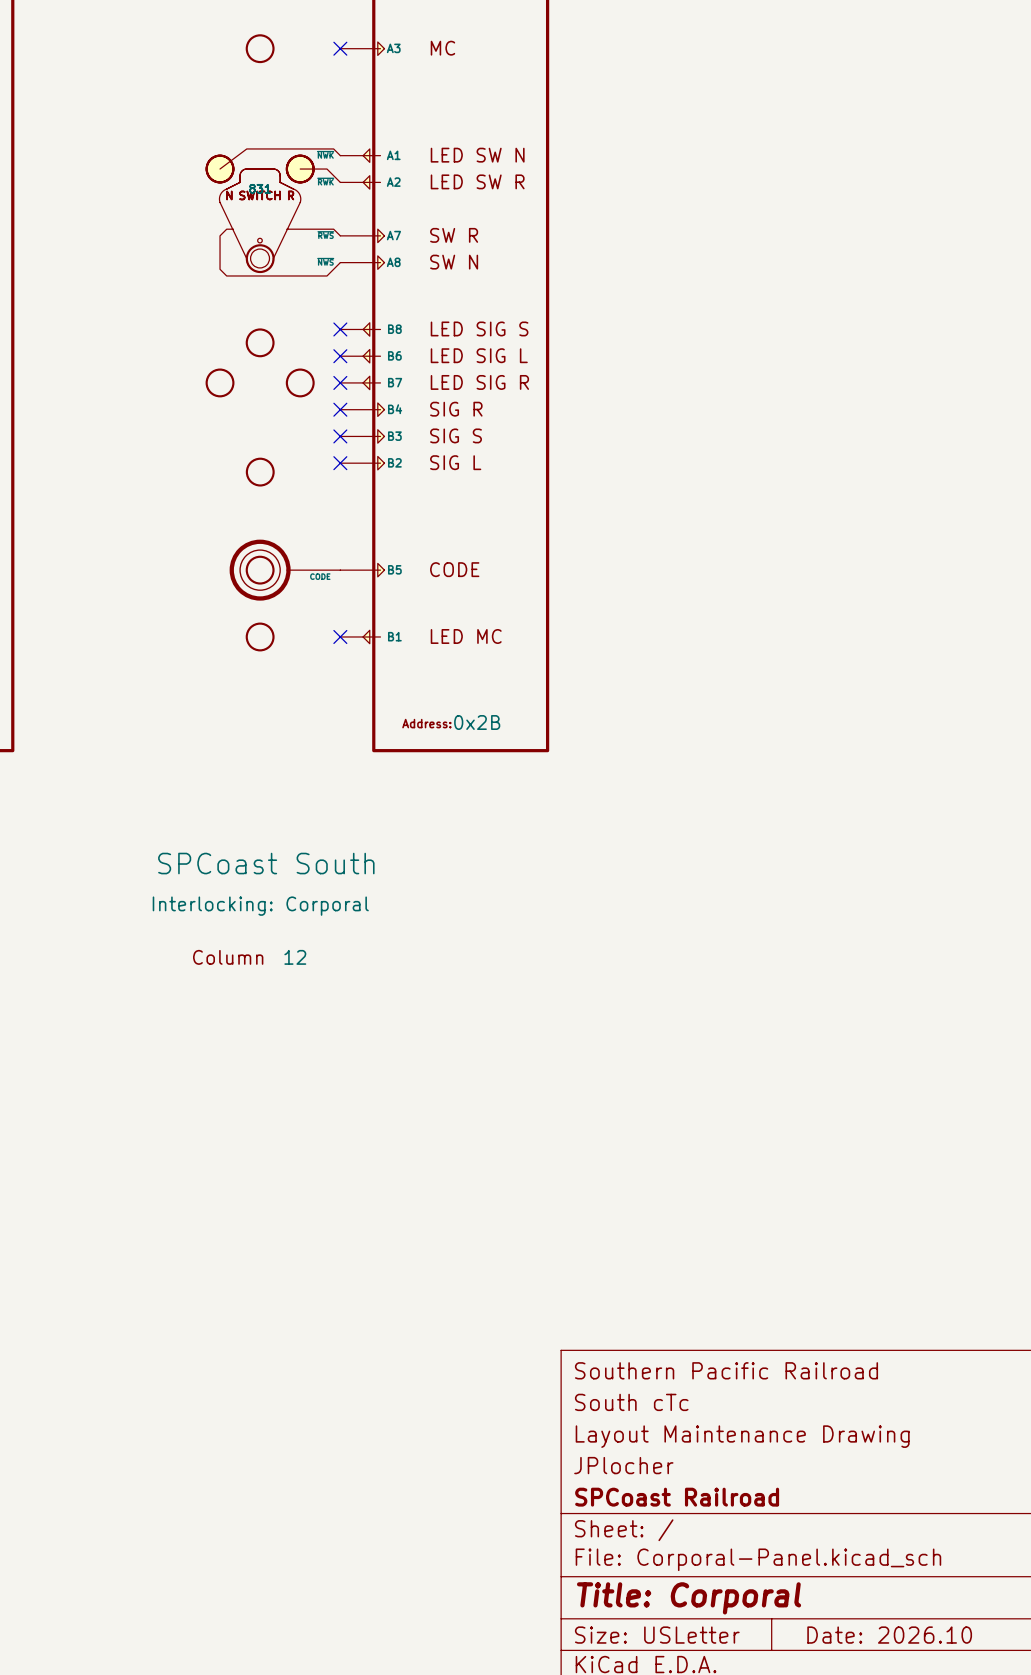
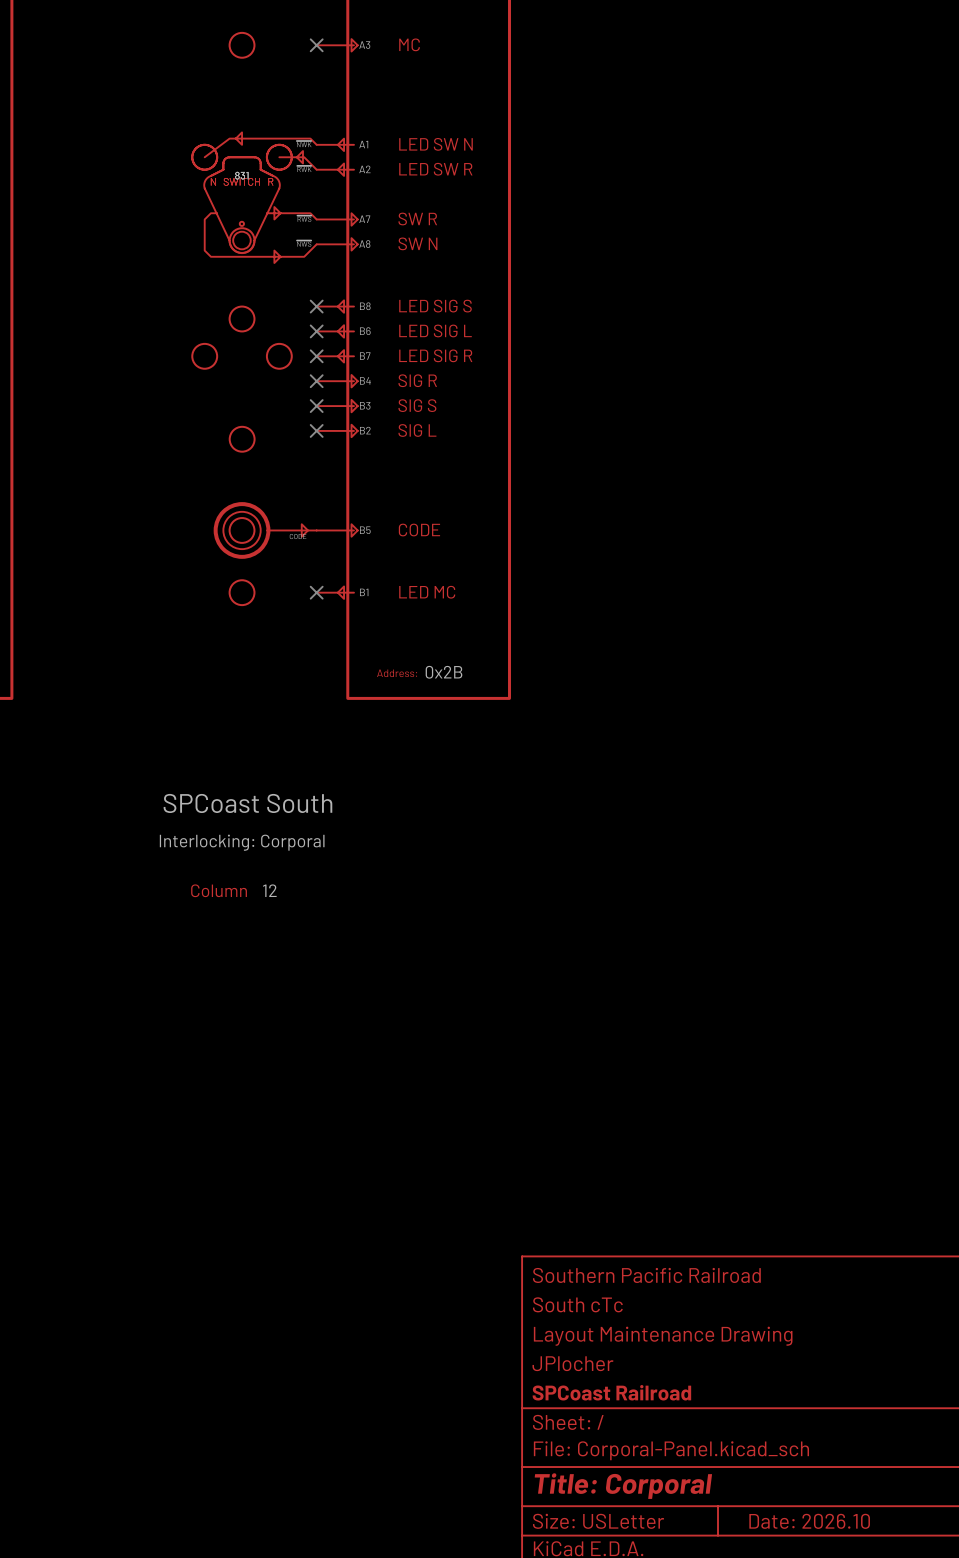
part symbol: [205, 148, 341, 190] -> [191, 132, 317, 176]
part symbol: [219, 169, 341, 276] -> [204, 157, 317, 264]
part symbol: [229, 539, 341, 601] -> [213, 502, 317, 559]

